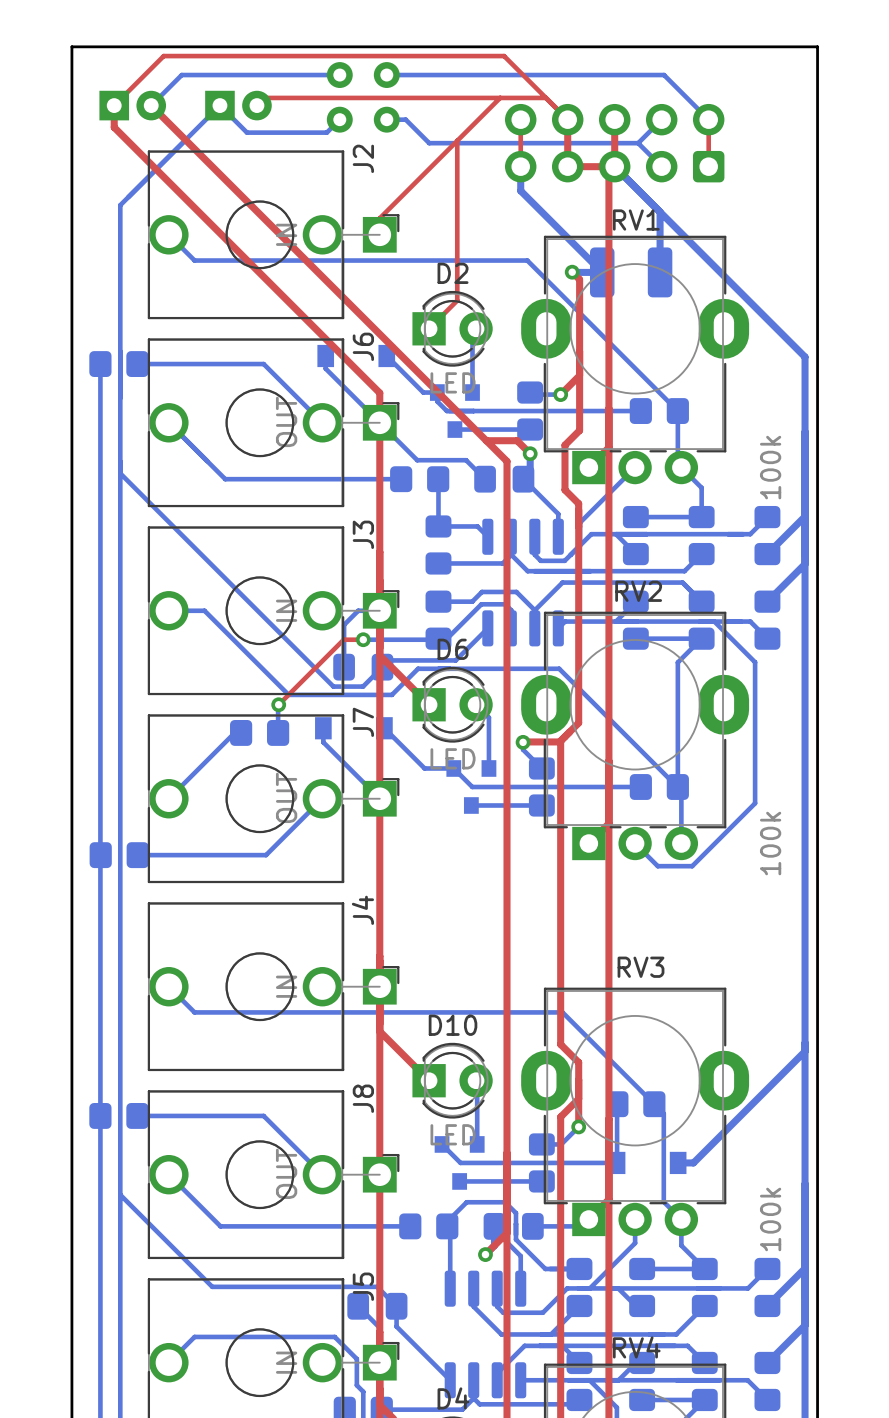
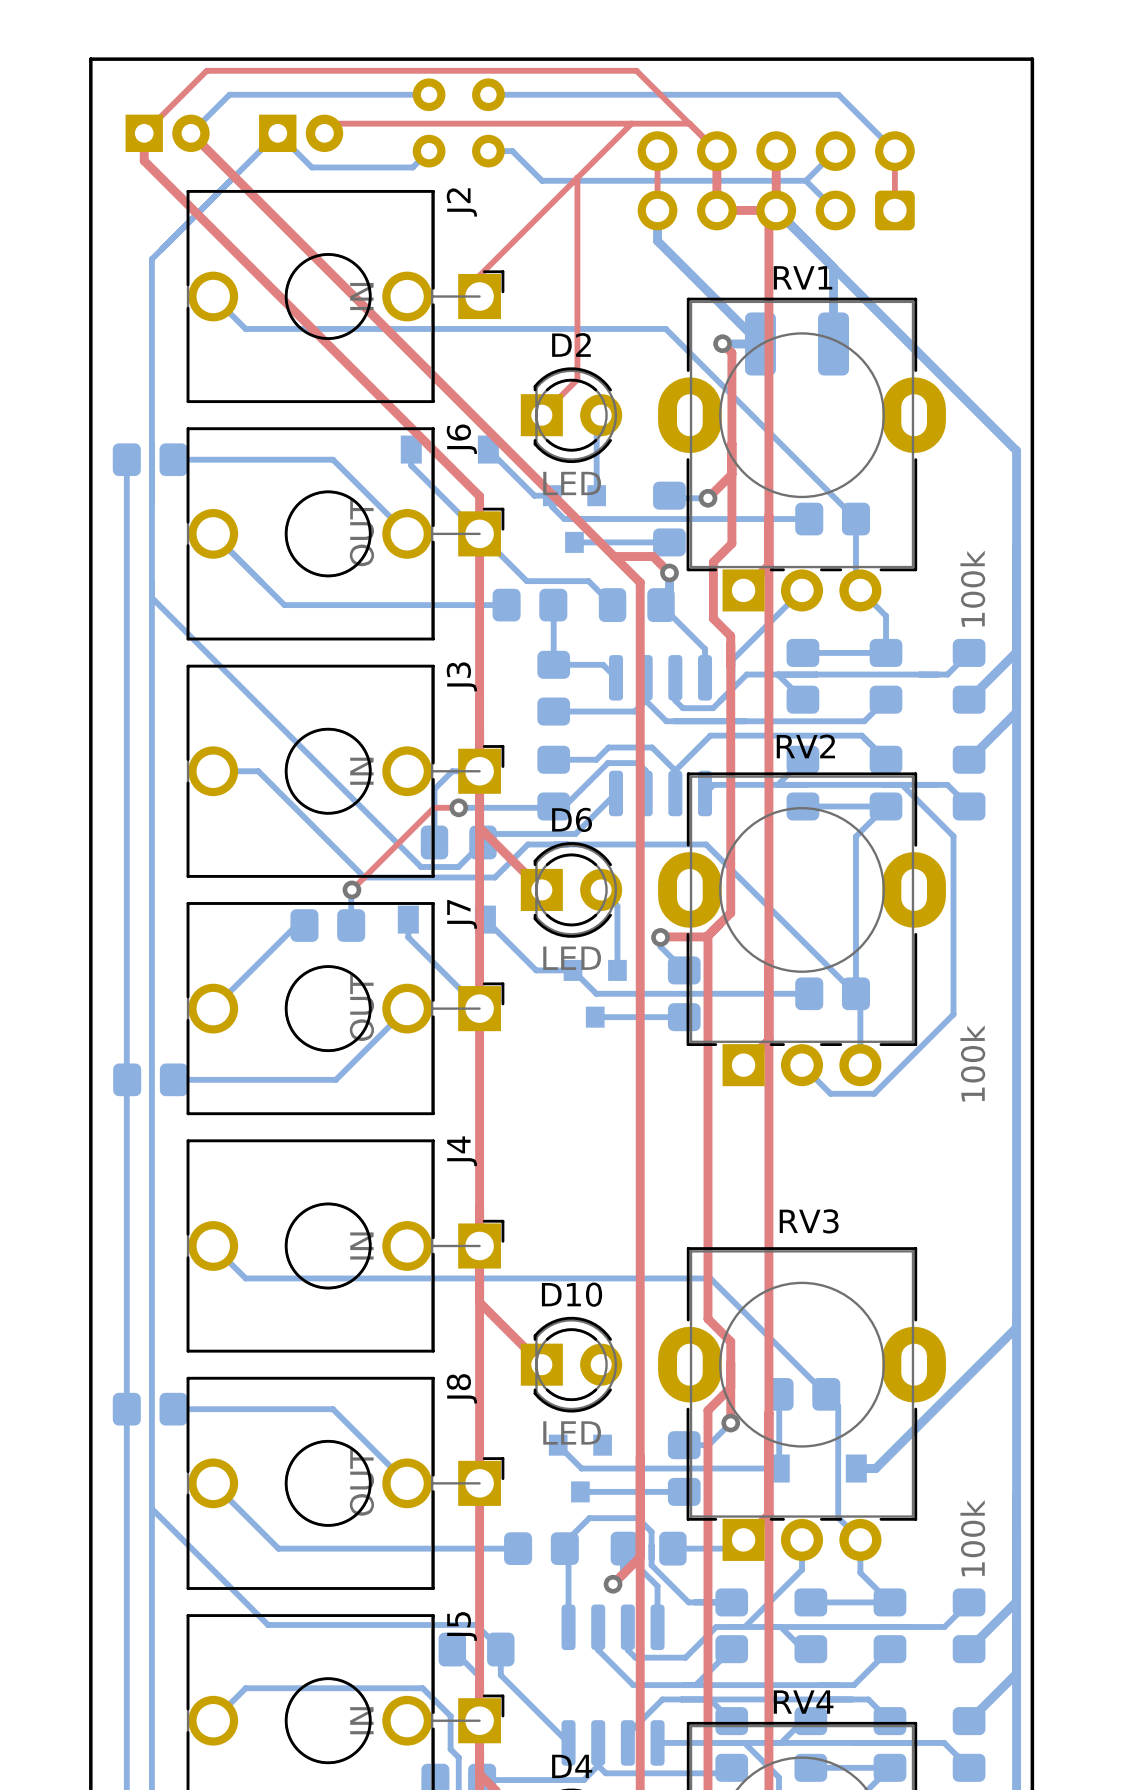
bottom track: (477, 1081) (477, 1144) -> none

